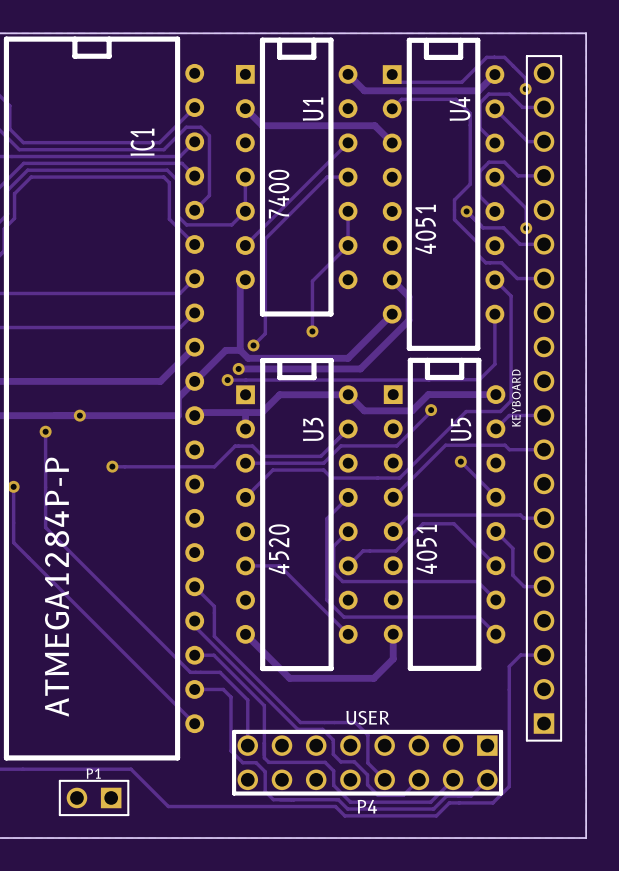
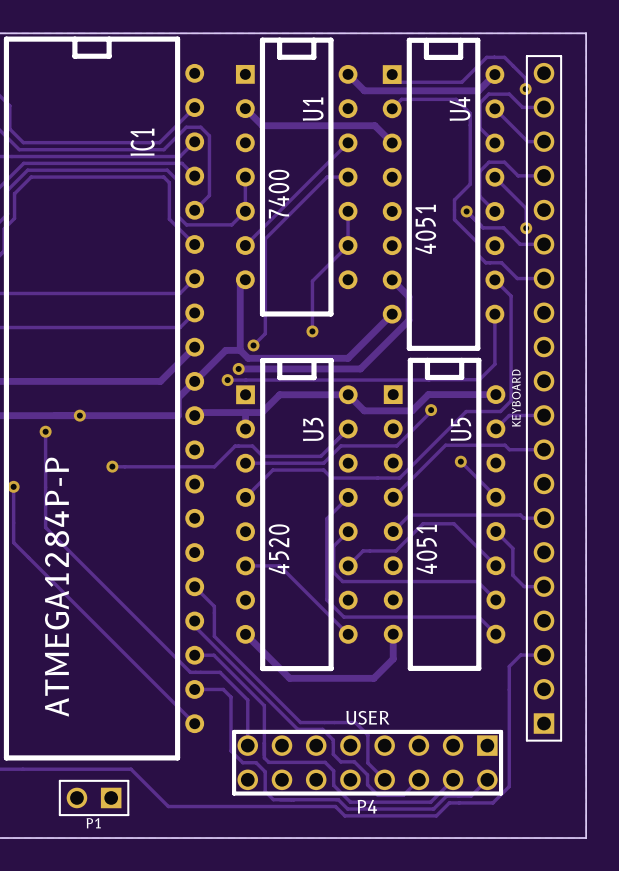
P1 name position: P1 (93, 773) -> P1 (93, 823)

